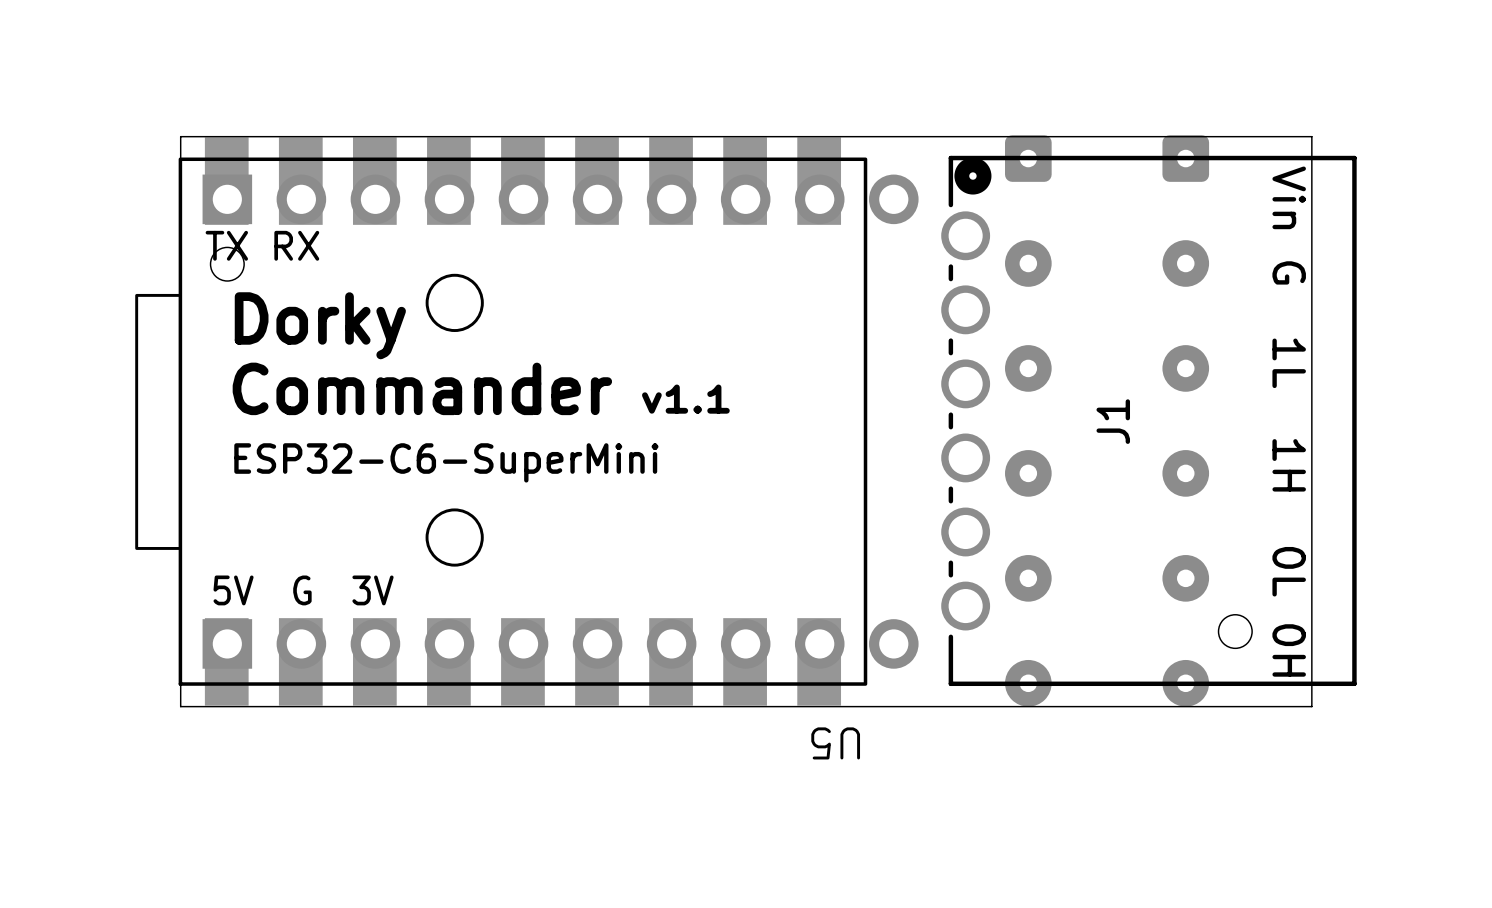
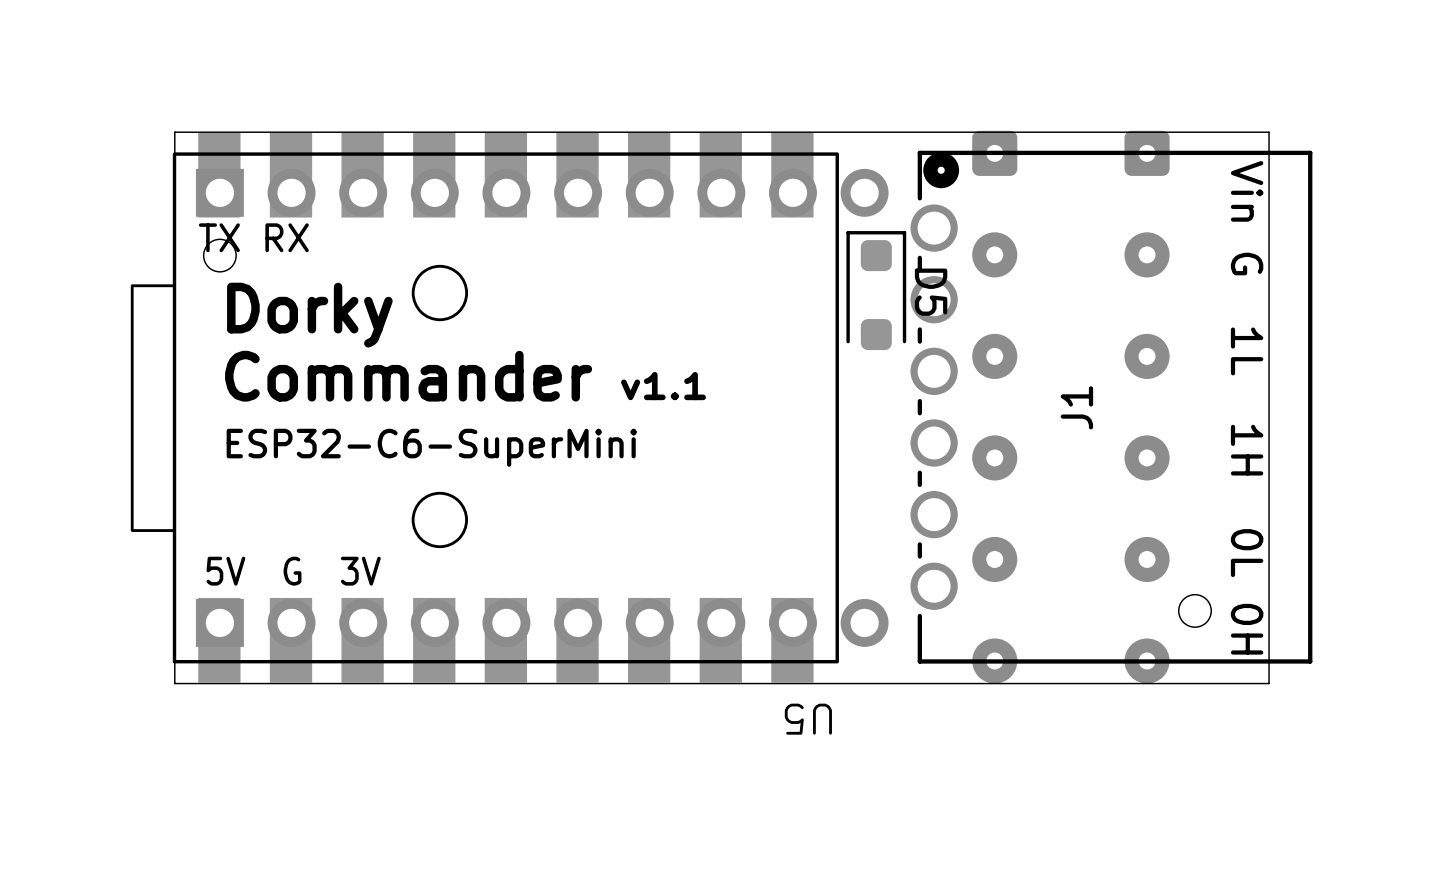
D5: none -> (876, 290)

